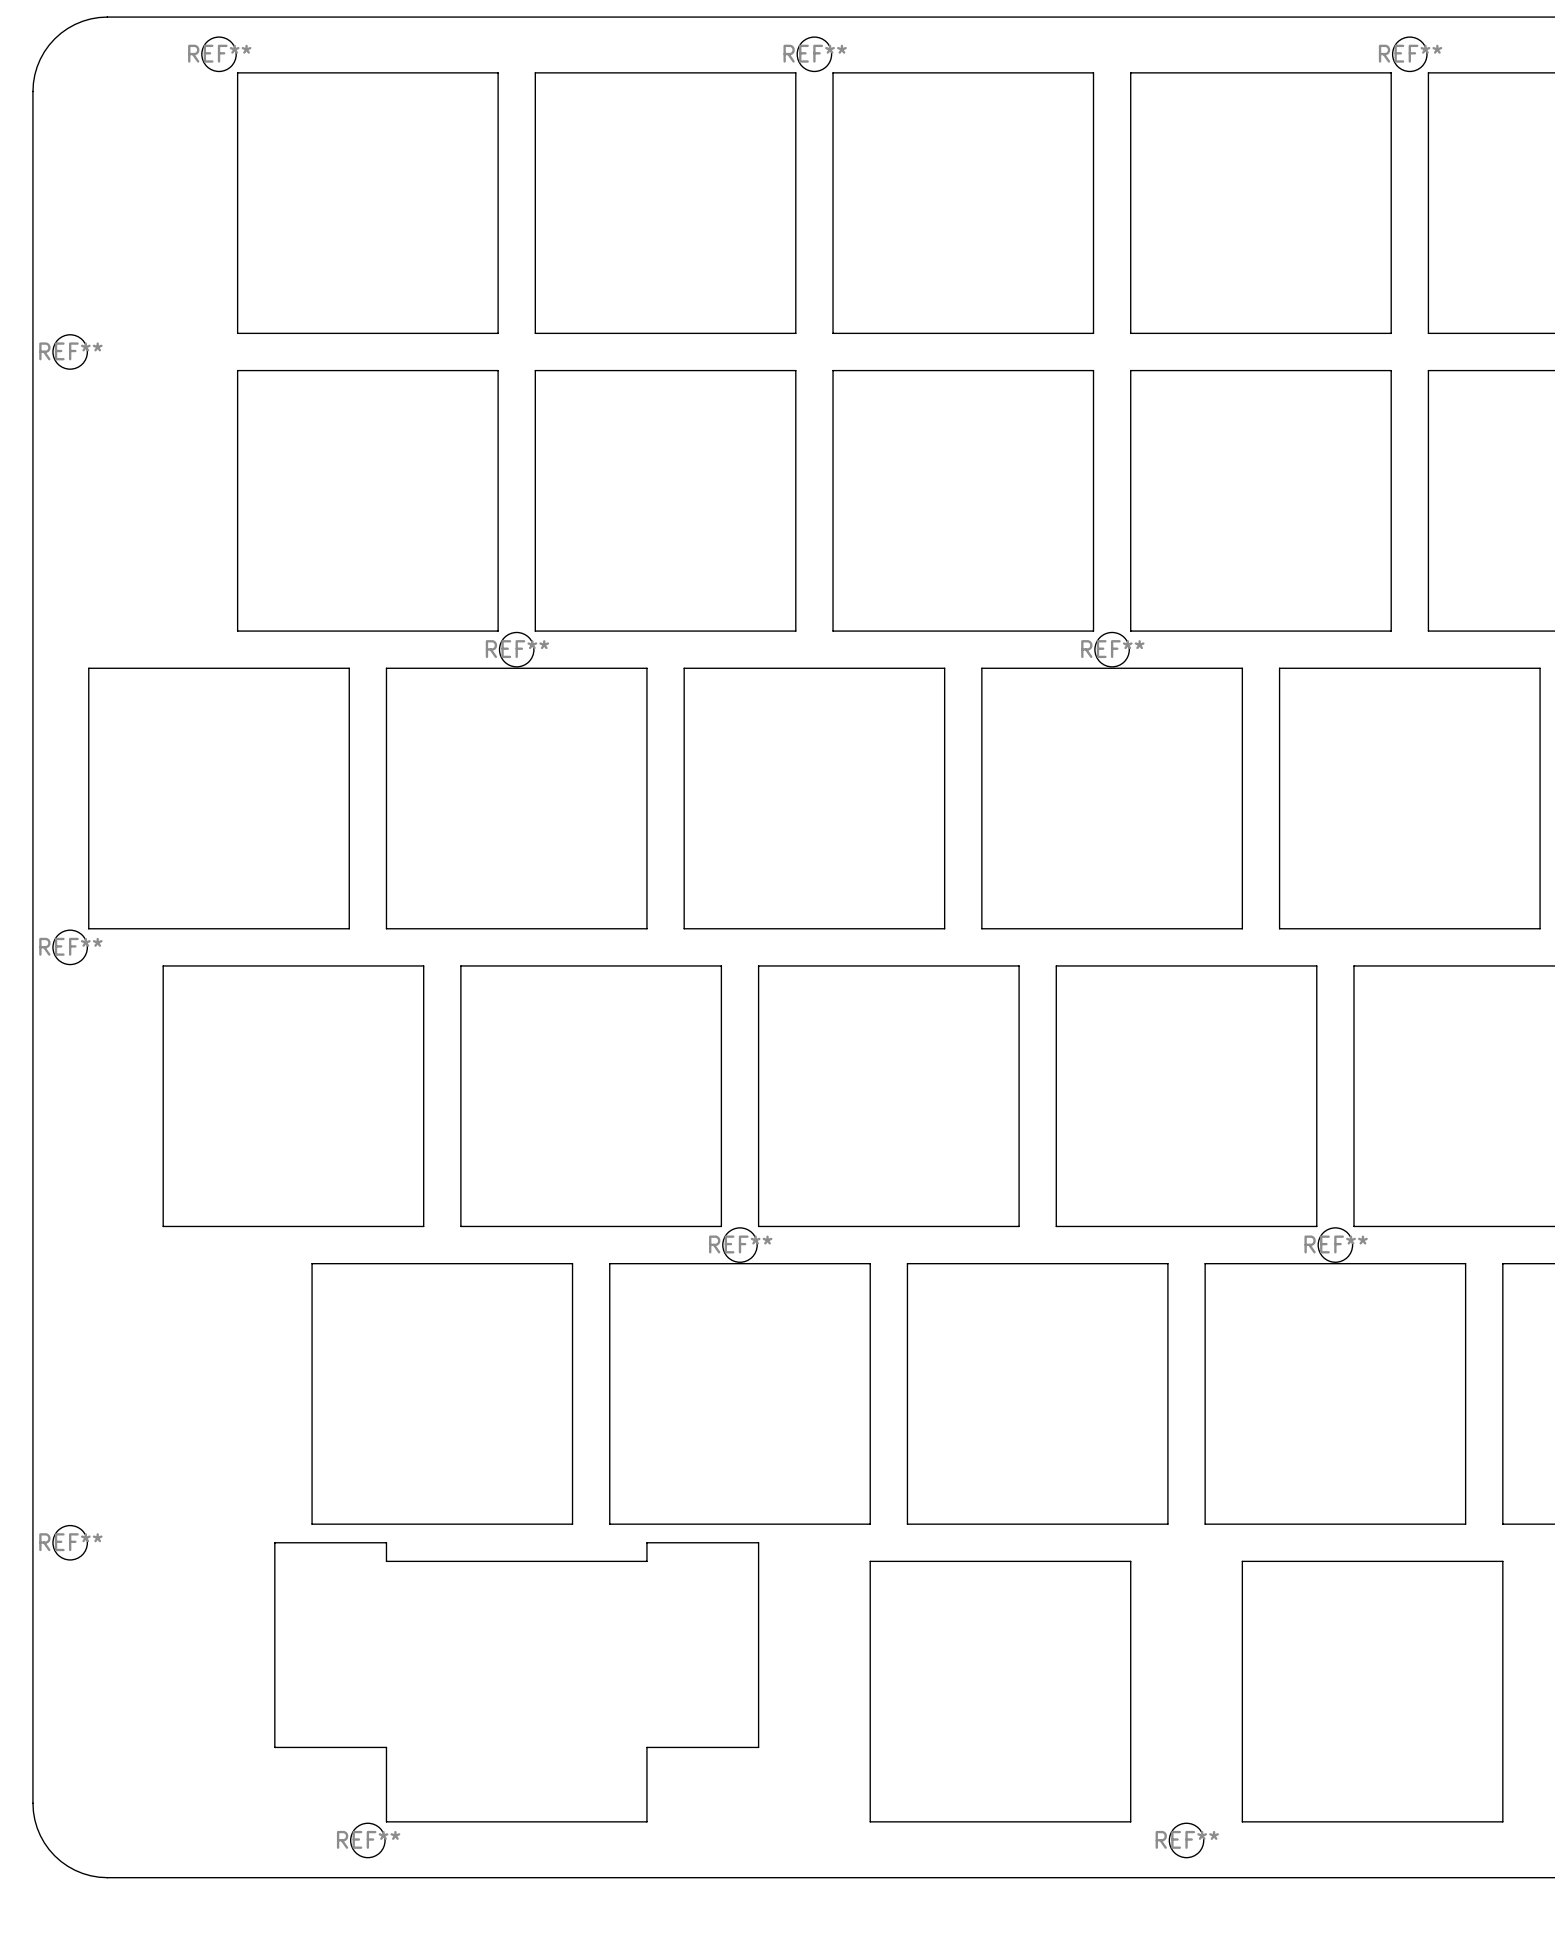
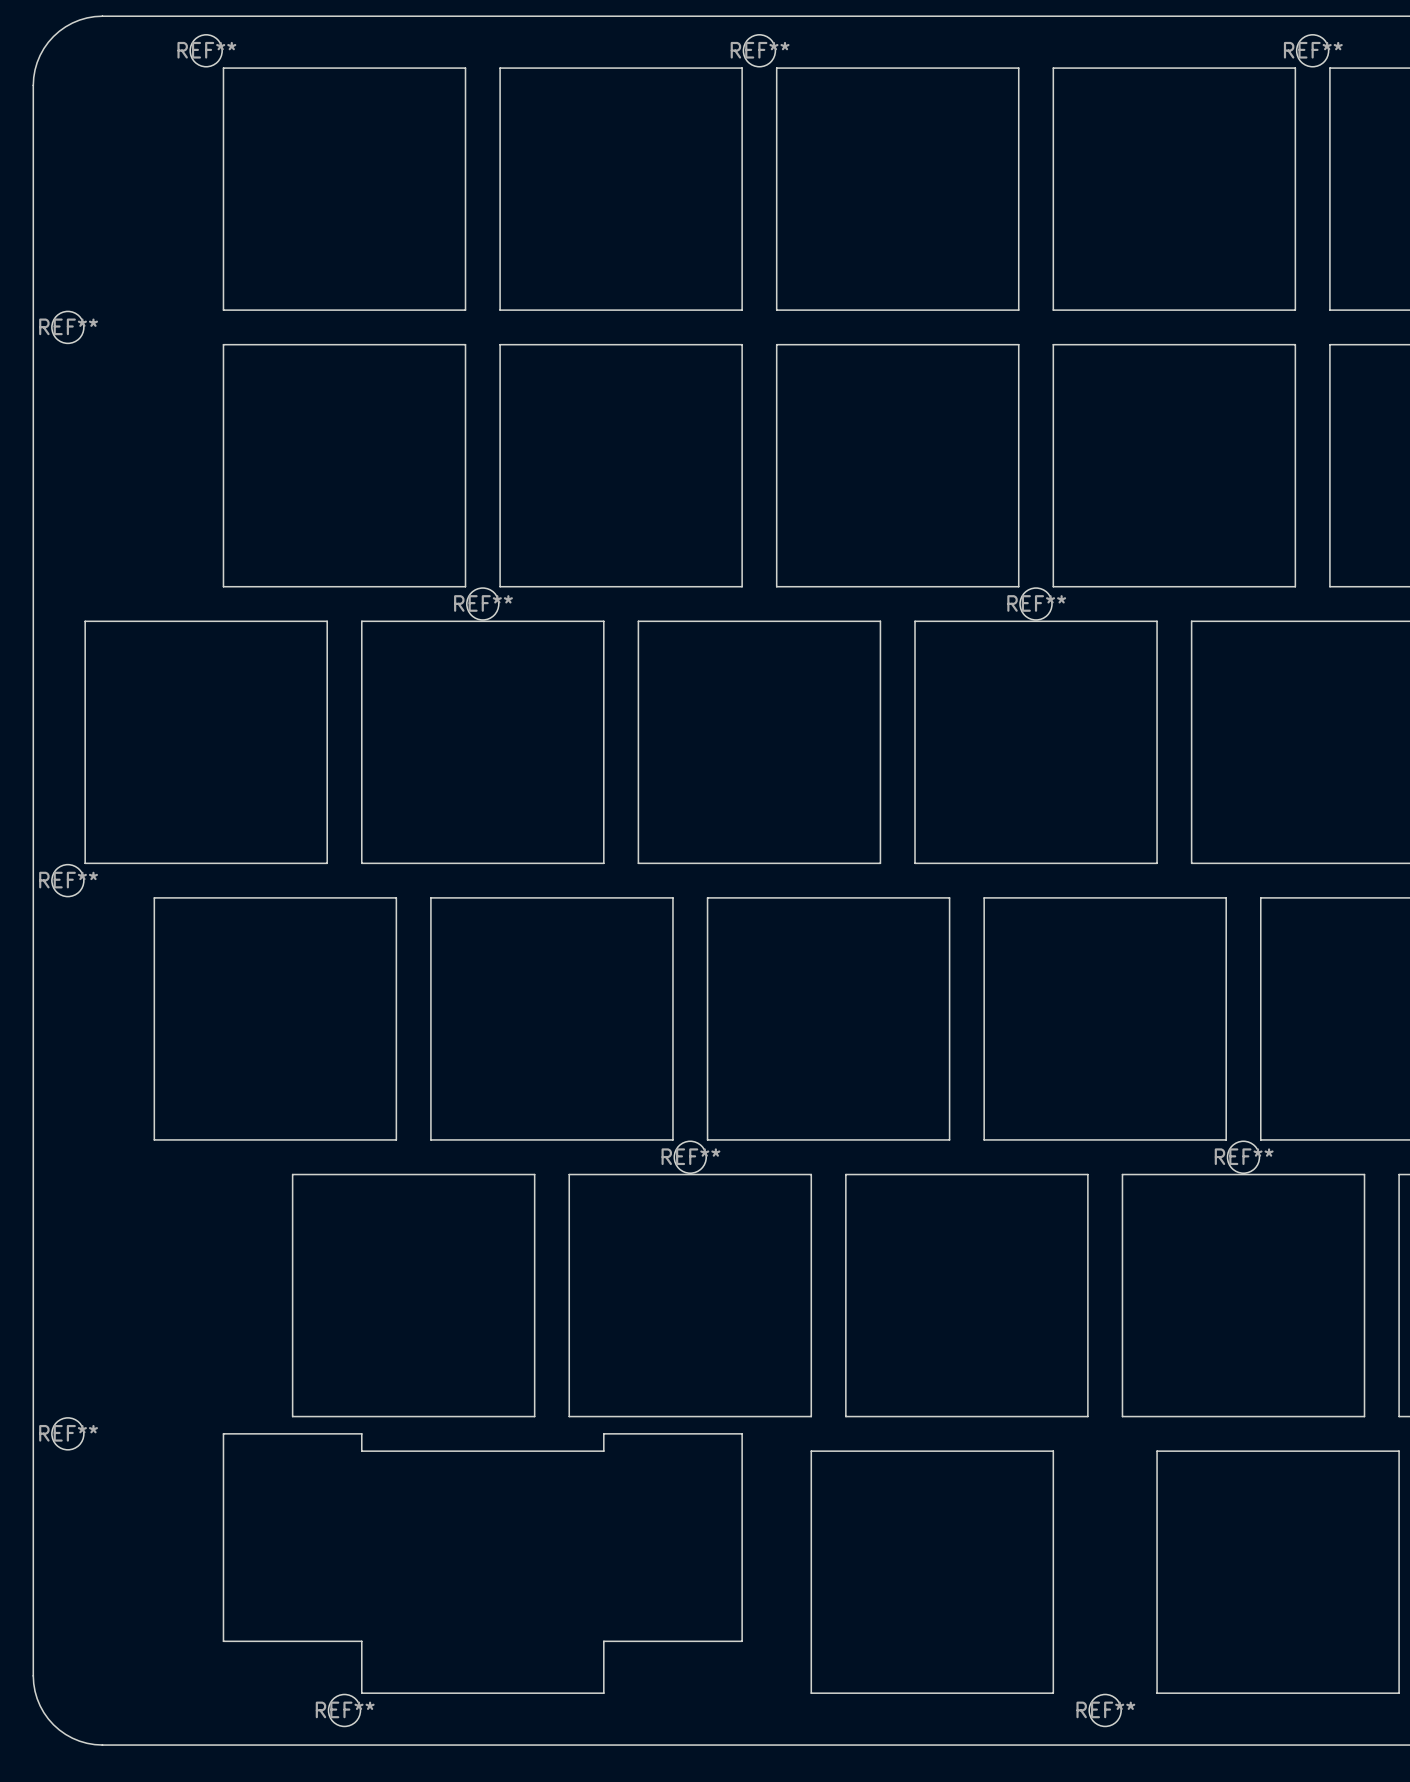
board edge: (274, 1542) (274, 1747) (386, 1747) (386, 1766) -> (258, 1433) (223, 1433) (223, 1641) (361, 1641)
board edge: (758, 1542) (758, 1747) (646, 1747) (646, 1766) -> (707, 1433) (742, 1433) (742, 1641) (603, 1641)

